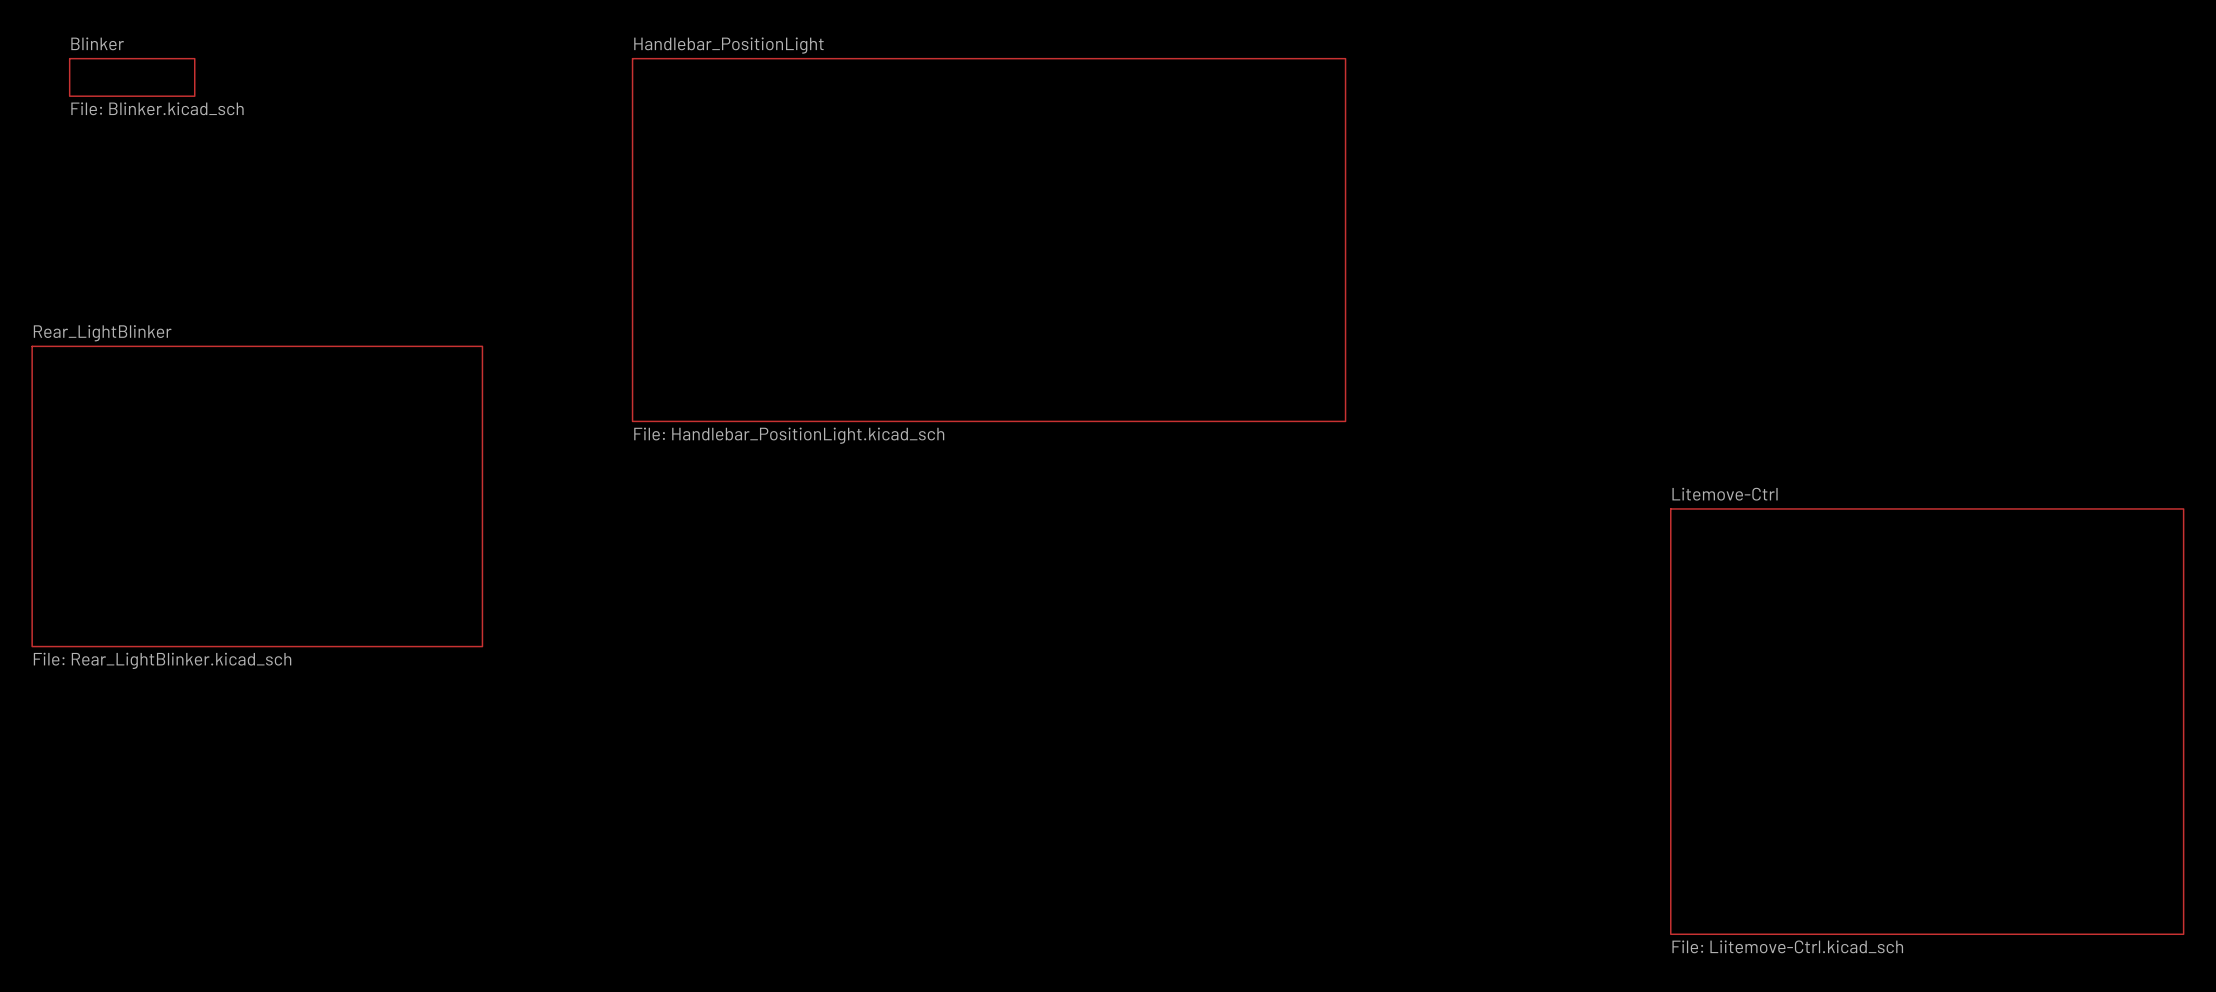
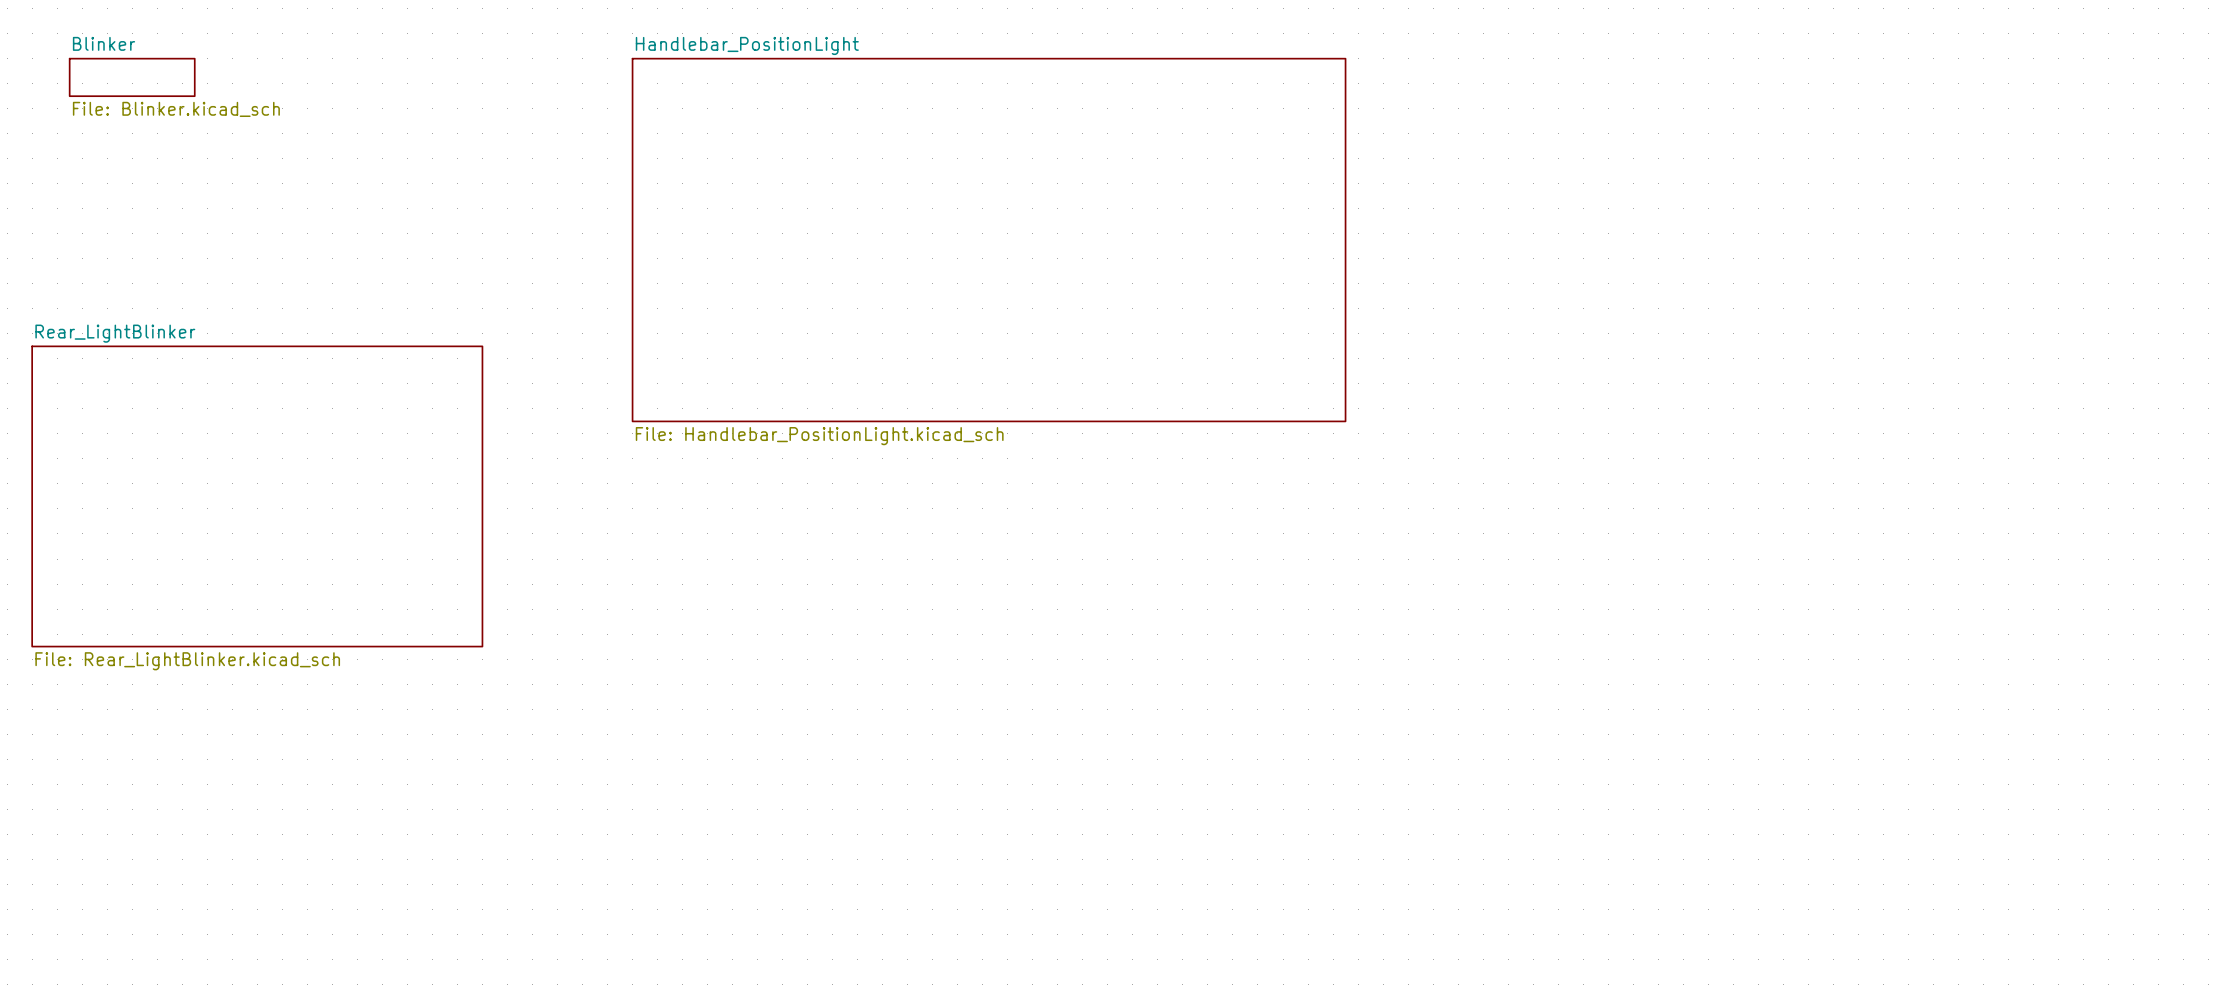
sheet Litemove-Ctrl: File: Liitemove-Ctrl.kicad_sch (1927, 721) -> none

